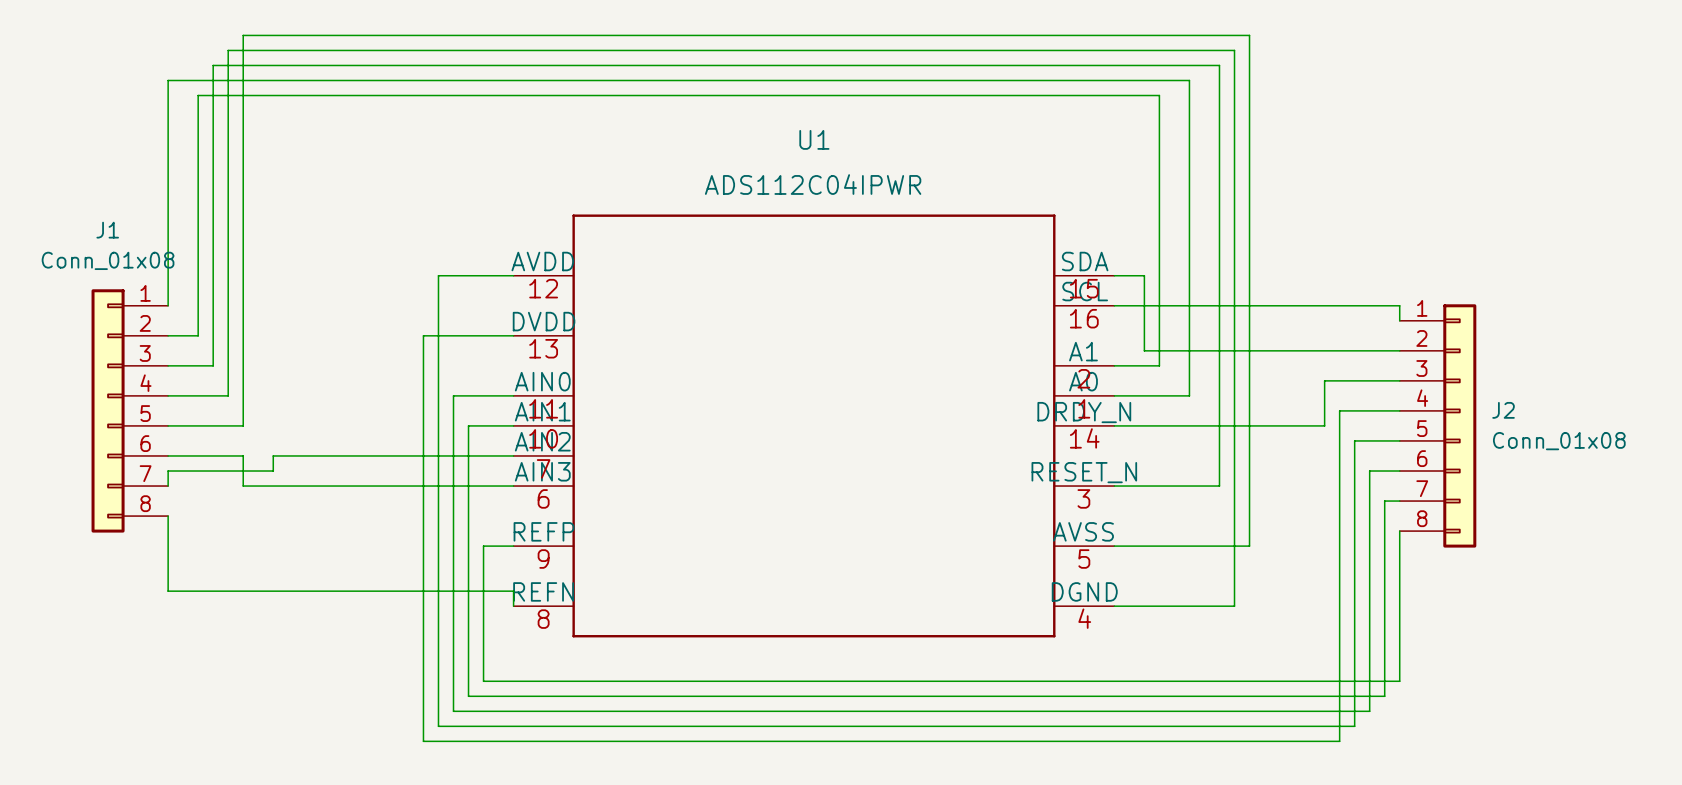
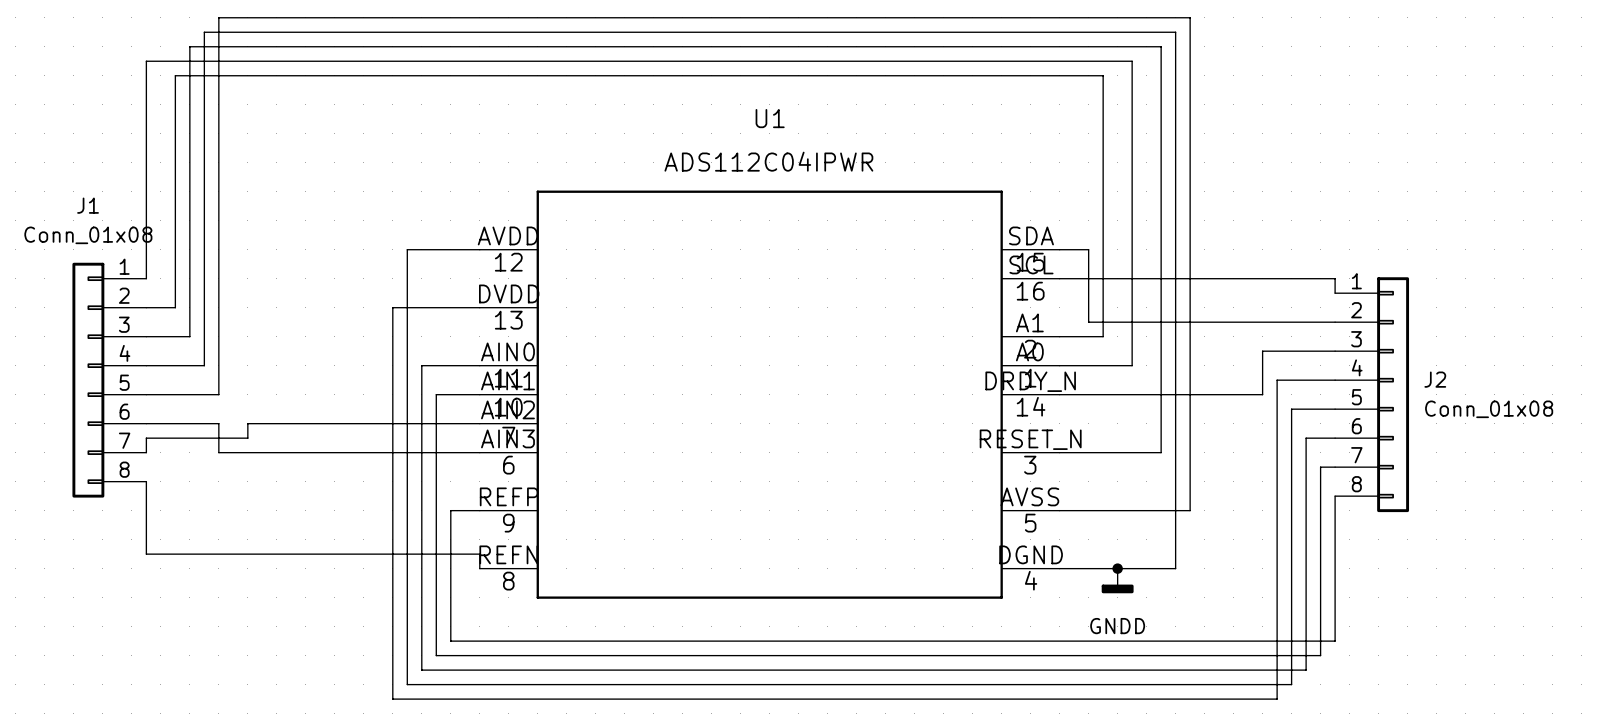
junction: none -> (1117, 568)
power symbol: none -> GNDD (1117, 580)

